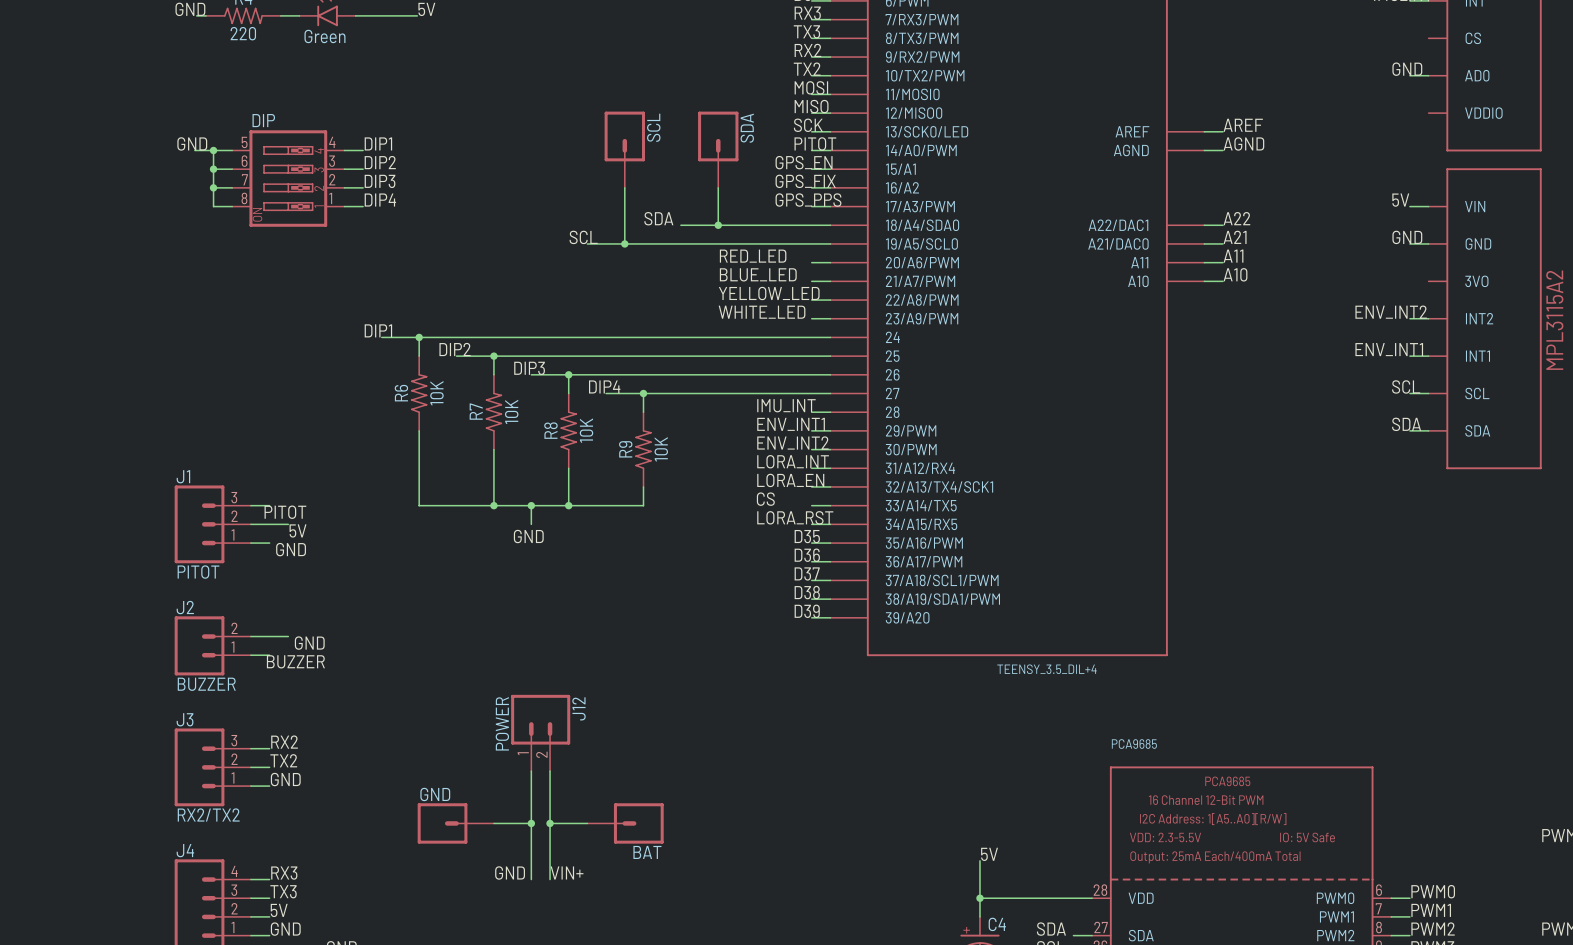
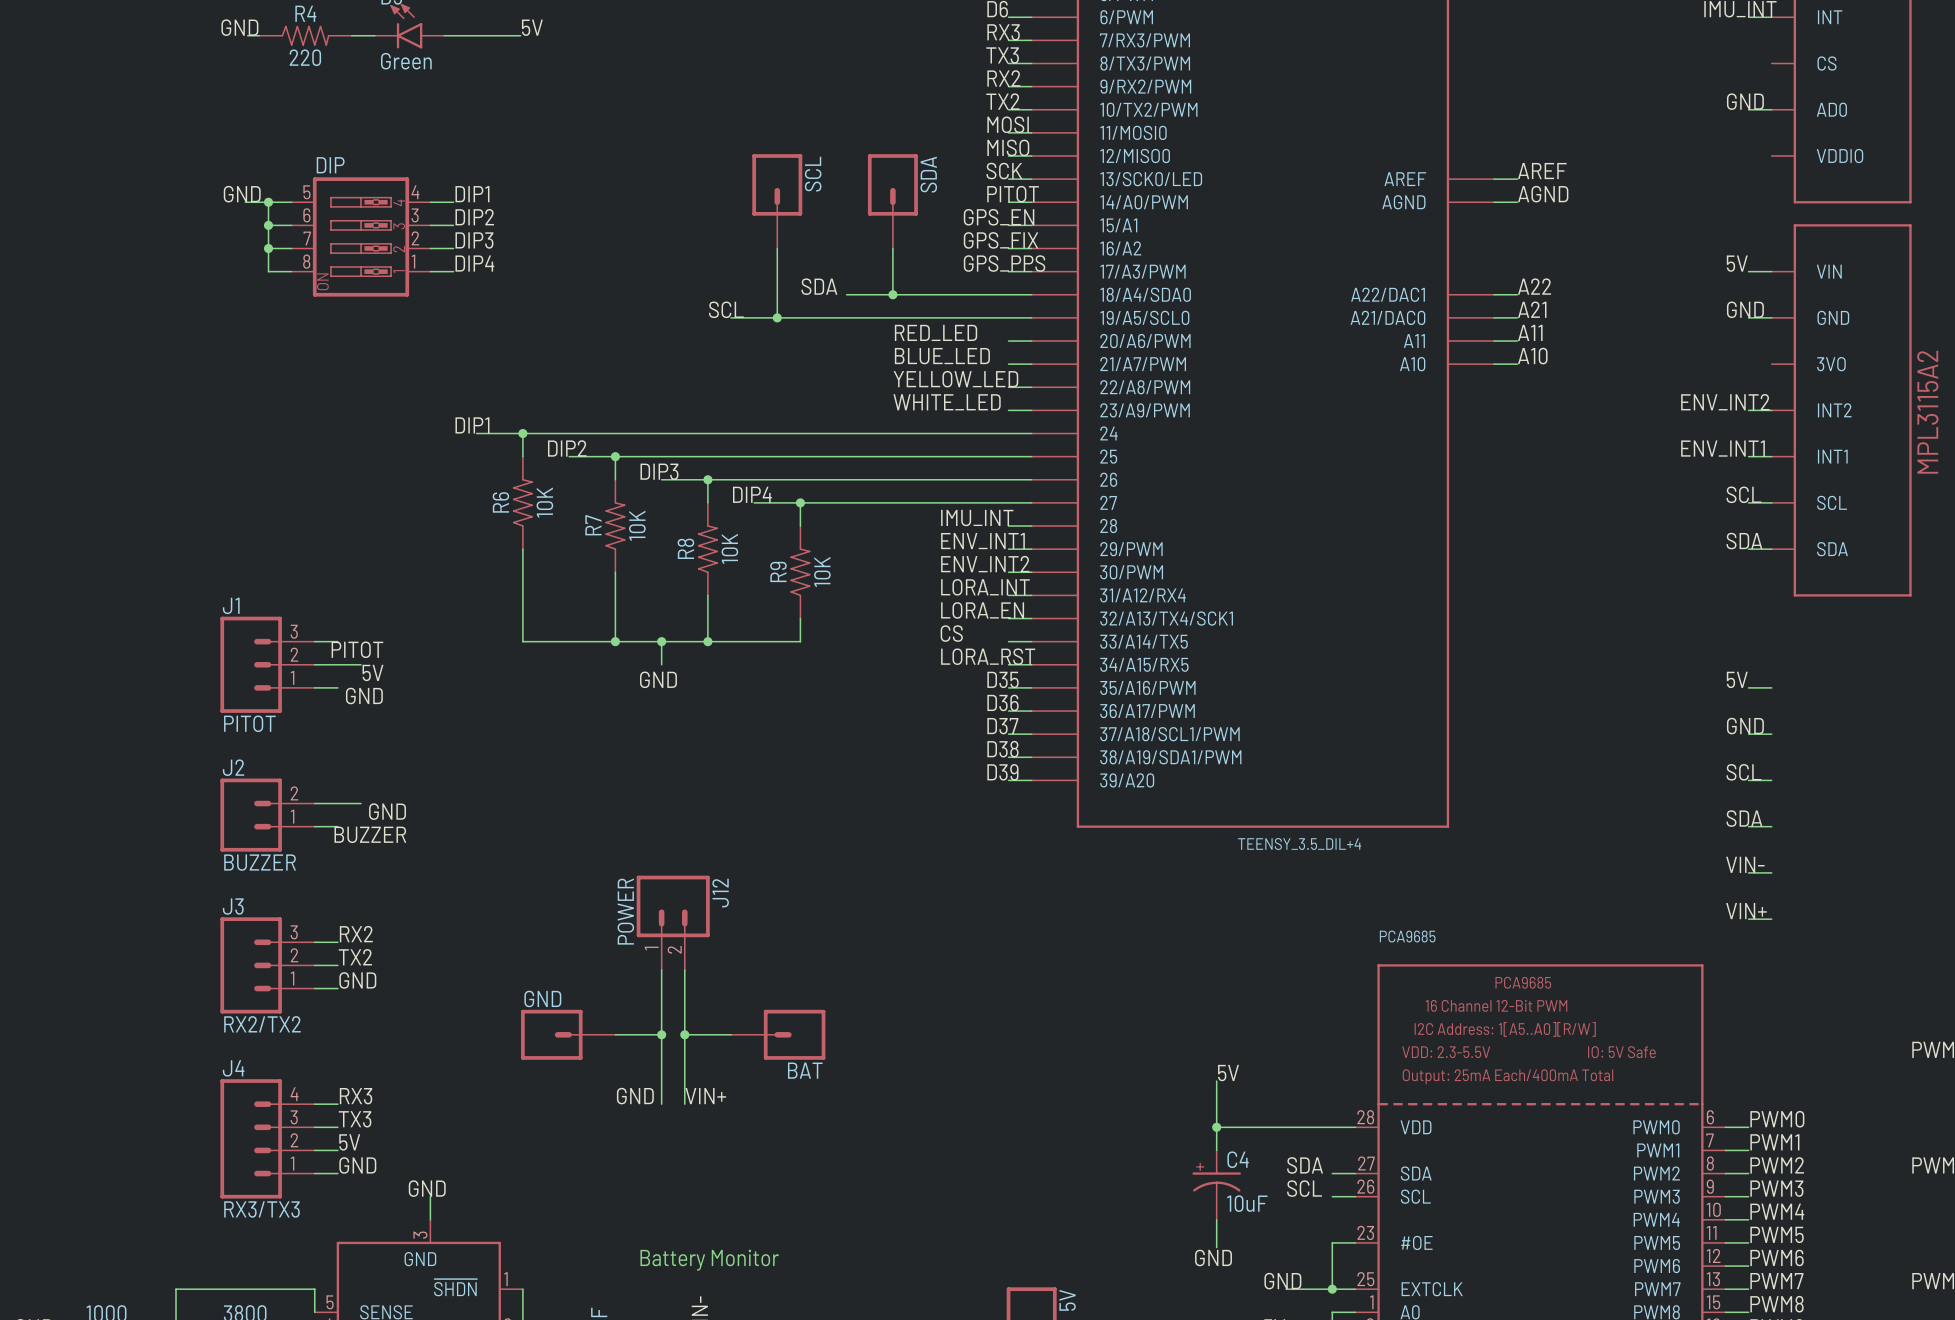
label: none -> 5V (1737, 679)
wire: none -> (1748, 687) (1771, 687)
label: none -> GND (1745, 726)
wire: none -> (1748, 734) (1771, 734)
label: none -> SCL (1743, 772)
wire: none -> (1748, 780) (1771, 780)
label: none -> SDA (1744, 818)
wire: none -> (1748, 826) (1771, 826)
label: none -> VIN- (1745, 864)
wire: none -> (1748, 872) (1771, 872)
label: none -> VIN+ (1746, 911)
wire: none -> (1748, 919) (1771, 919)

